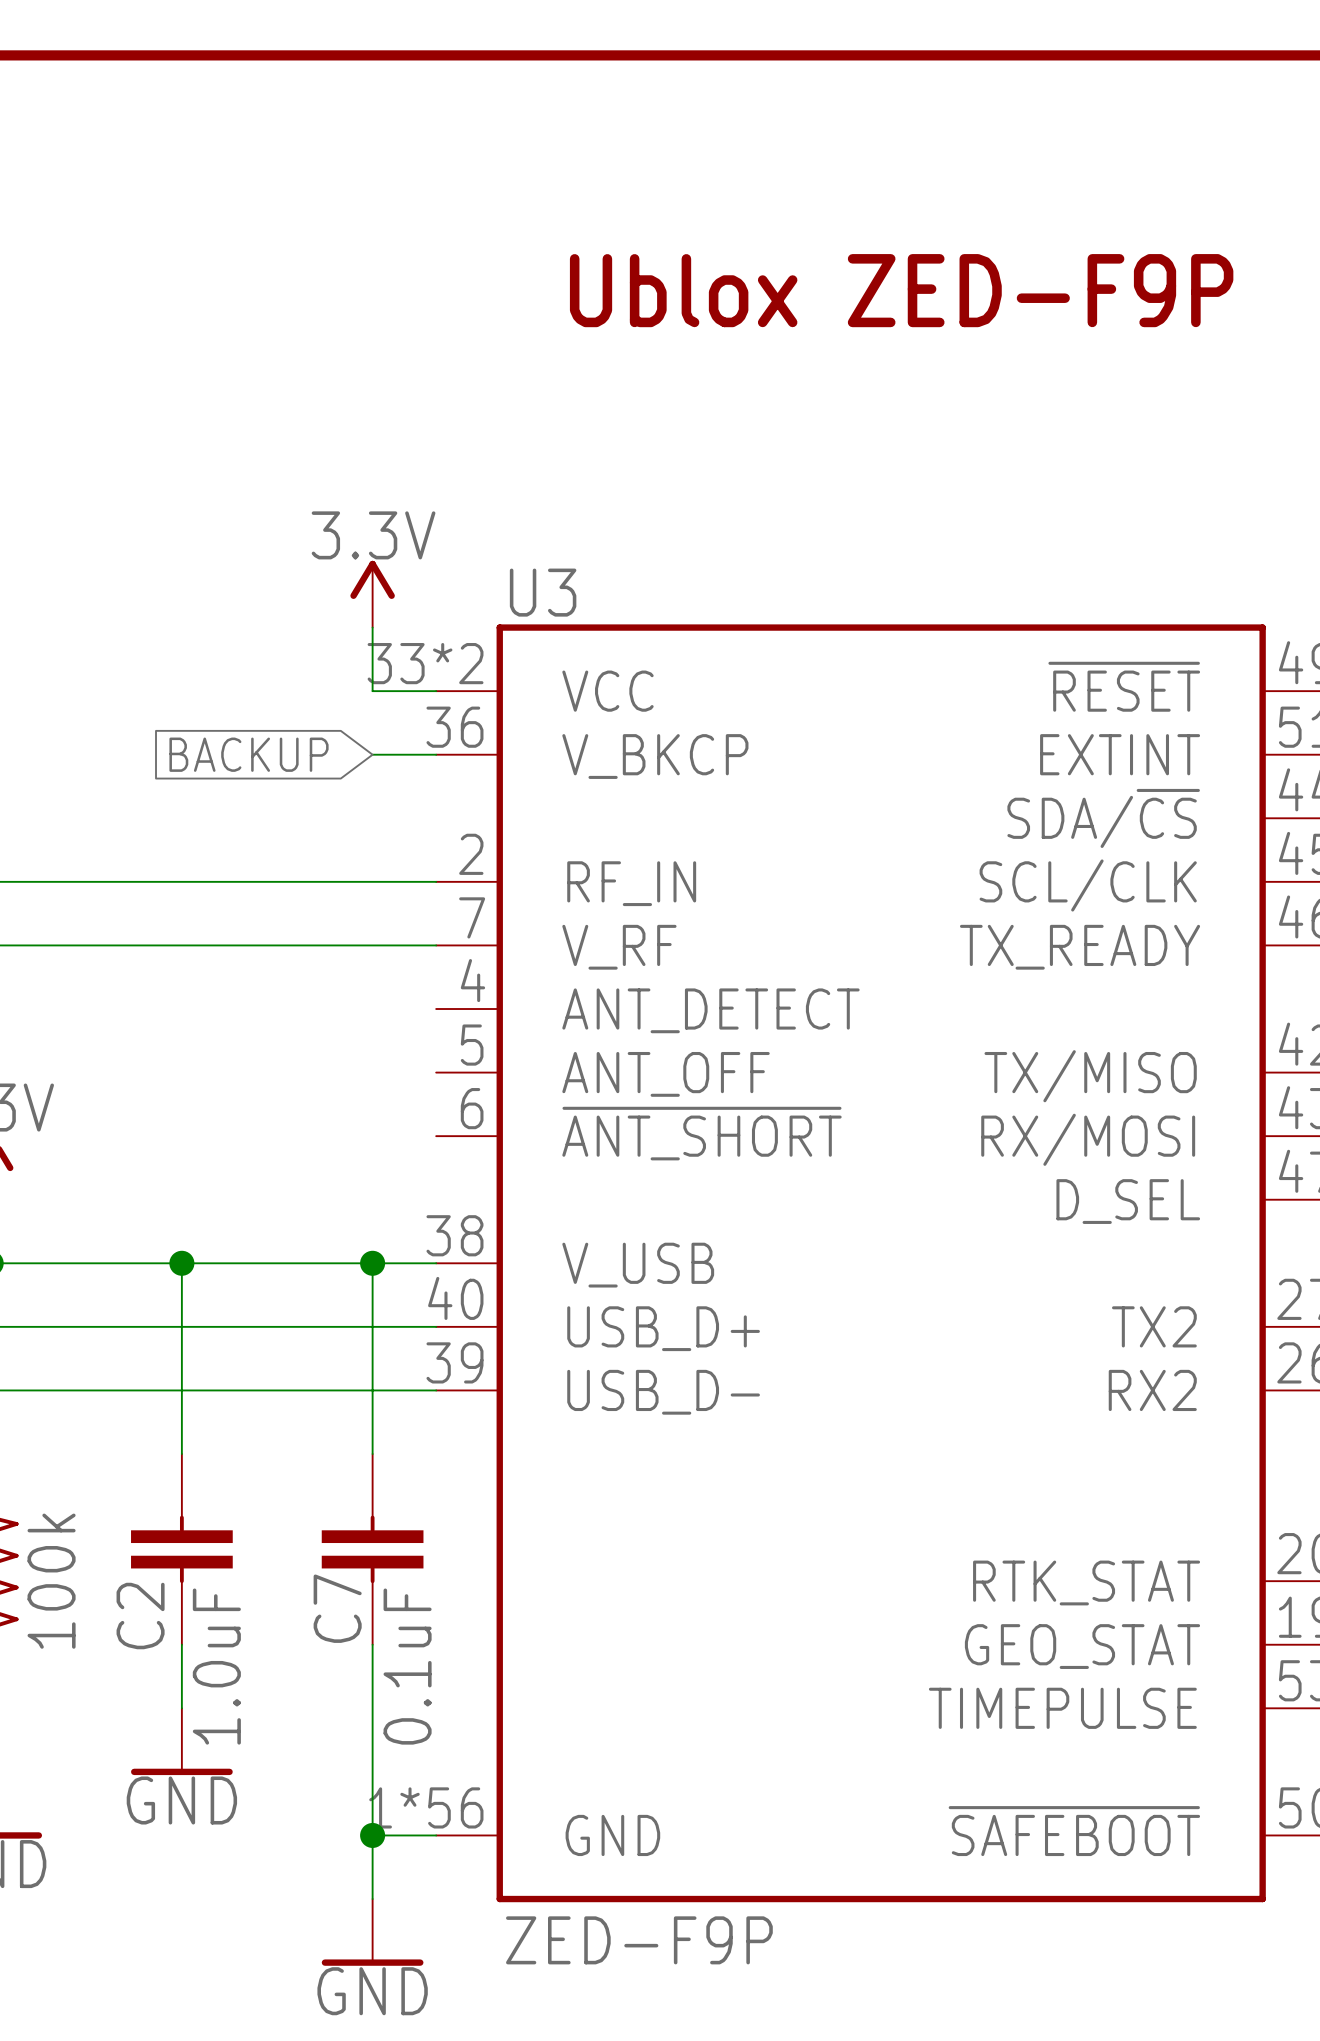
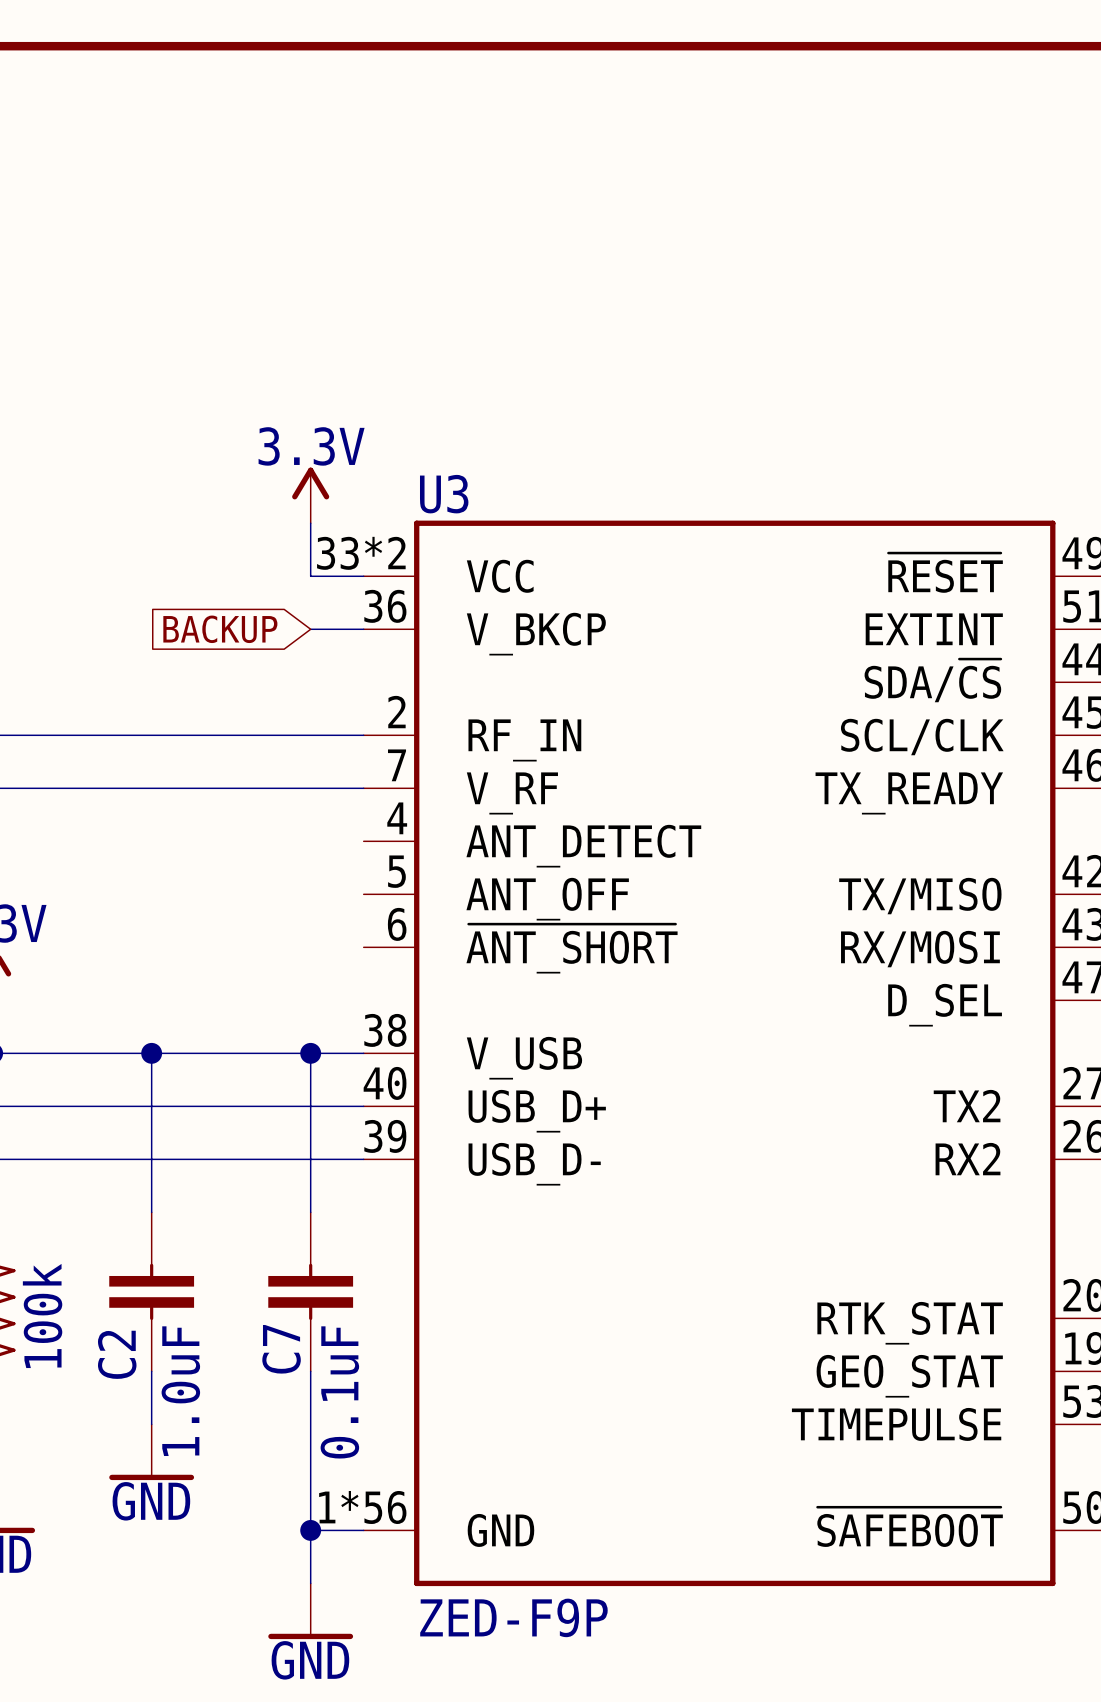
text: Ublox ZED-F9P (901, 290) -> none

